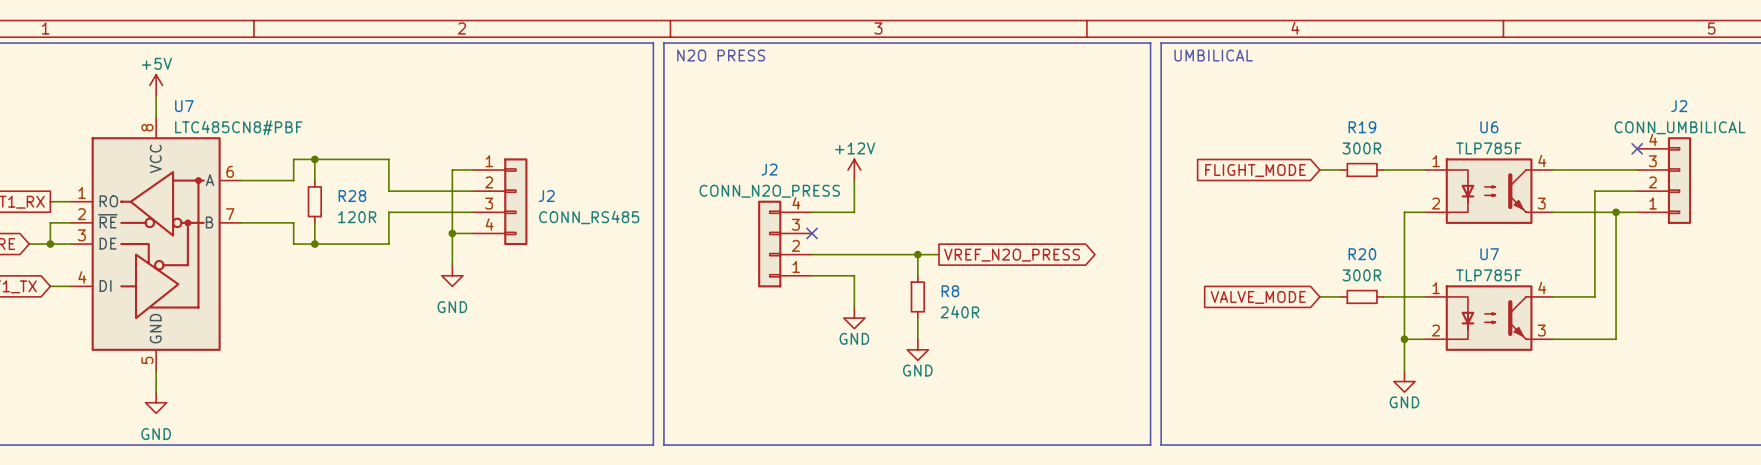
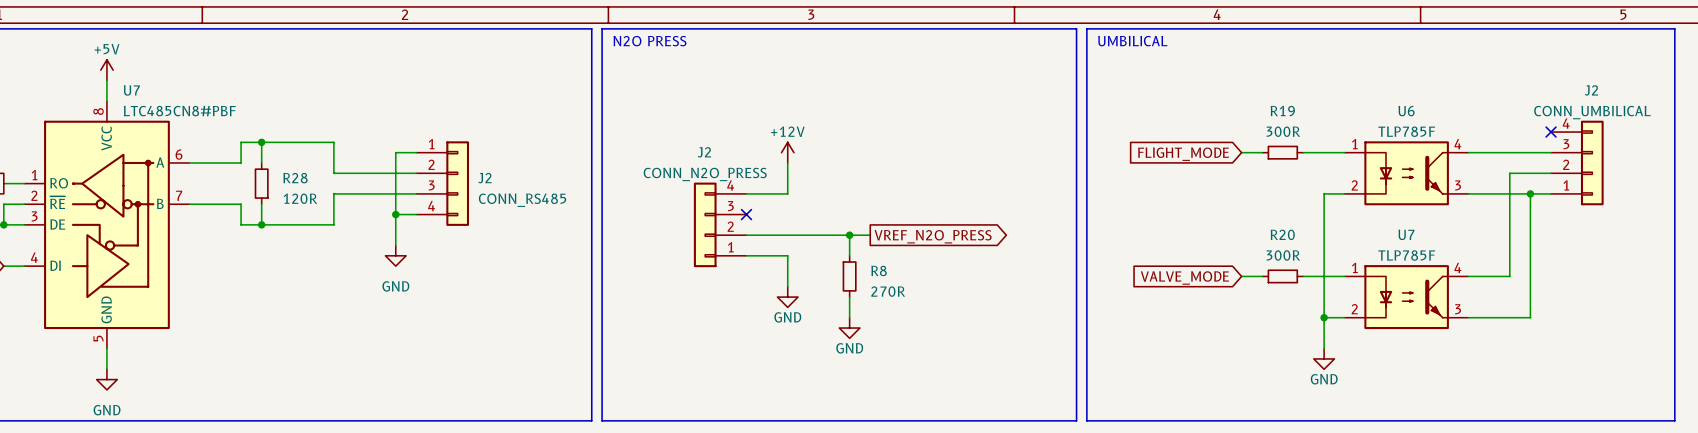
R8 value: 240R (959, 312) -> 270R (888, 291)

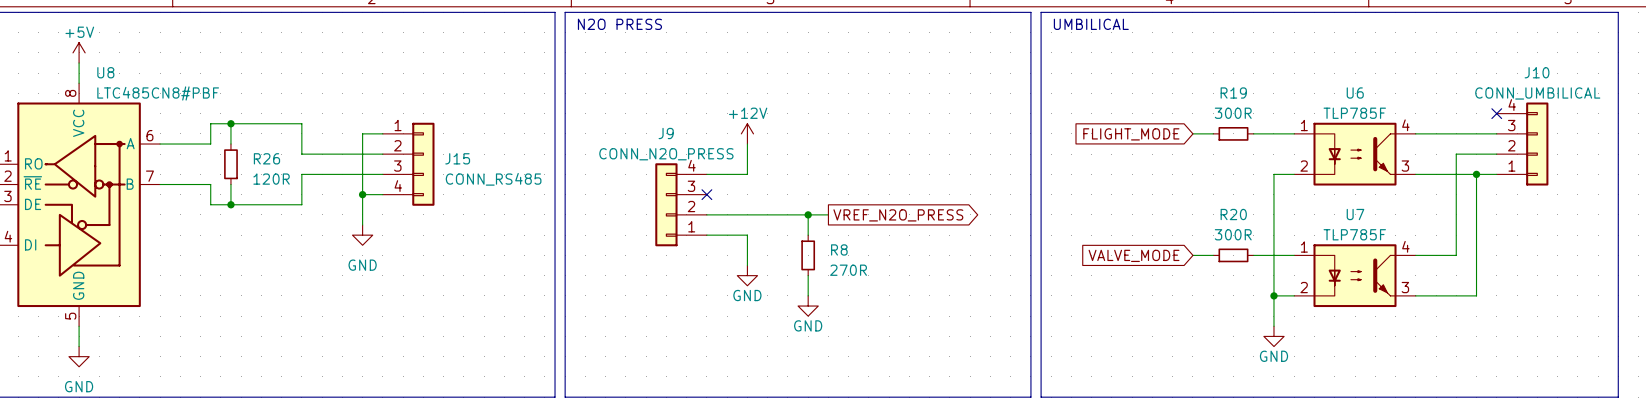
U7 name: U7 (131, 90) -> U8 (105, 72)
J2 name: J2 (1591, 90) -> J10 (1537, 72)
J2 name: J2 (704, 152) -> J9 (666, 133)
R28 name: R28 (295, 178) -> R26 (266, 158)
J2 name: J2 (484, 178) -> J15 (457, 158)

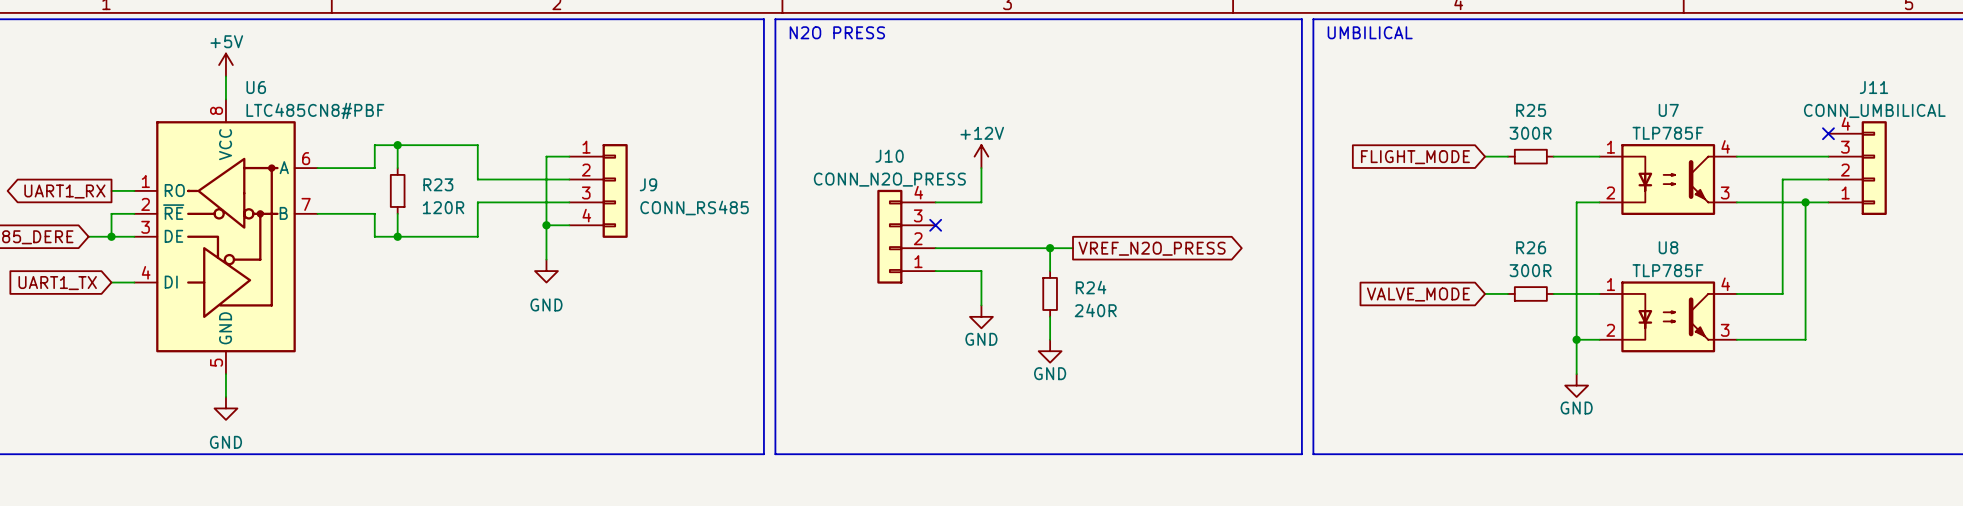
U8 name: U8 (105, 72) -> U6 (256, 87)
J10 name: J10 (1537, 72) -> J11 (1873, 87)
R19 name: R19 (1233, 93) -> R25 (1531, 110)
U6 name: U6 (1355, 93) -> U7 (1668, 110)
J9 name: J9 (666, 133) -> J10 (889, 156)
R26 name: R26 (266, 158) -> R23 (438, 184)
J15 name: J15 (457, 158) -> J9 (648, 184)
R20 name: R20 (1233, 214) -> R26 (1531, 247)
U7 name: U7 (1355, 214) -> U8 (1668, 247)
R8 name: R8 (839, 249) -> R24 (1091, 287)
R8 value: 270R (848, 270) -> 240R (1095, 310)

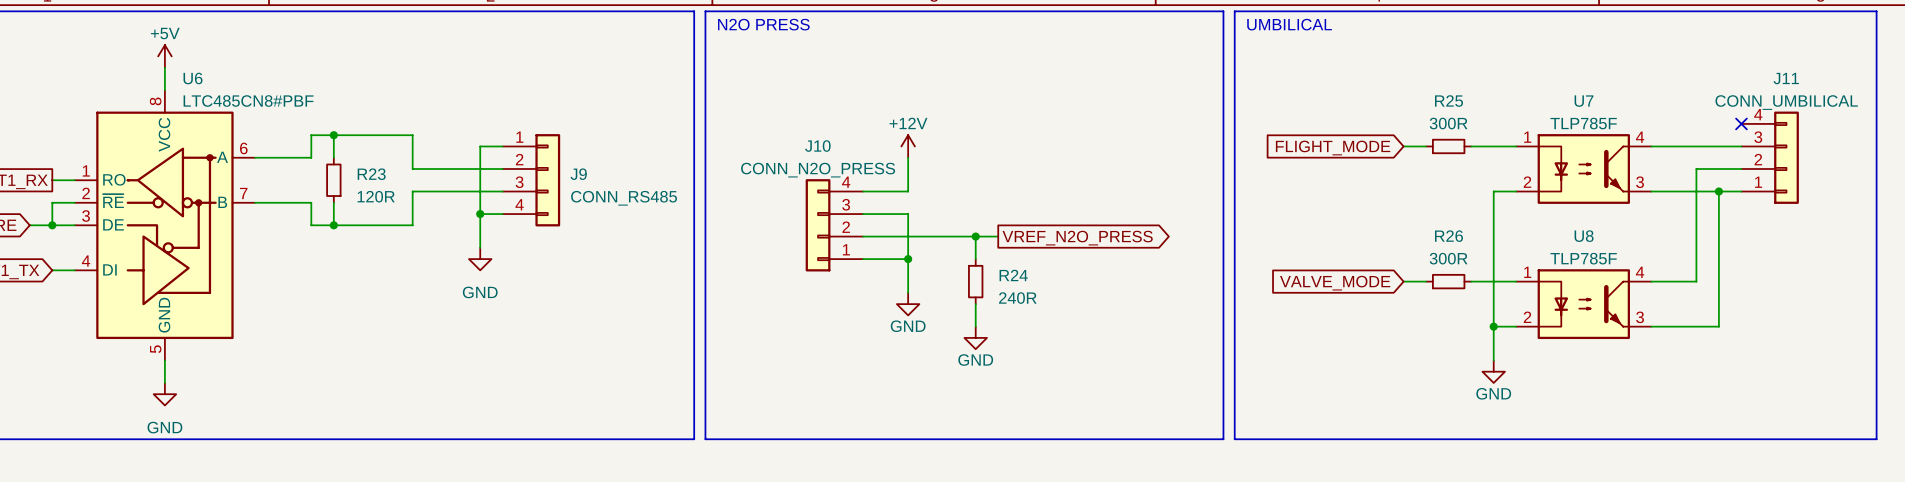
wire: none -> (863, 214) (908, 214) (908, 259)
no-connect mark: (935, 225) -> none
junction: none -> (908, 259)

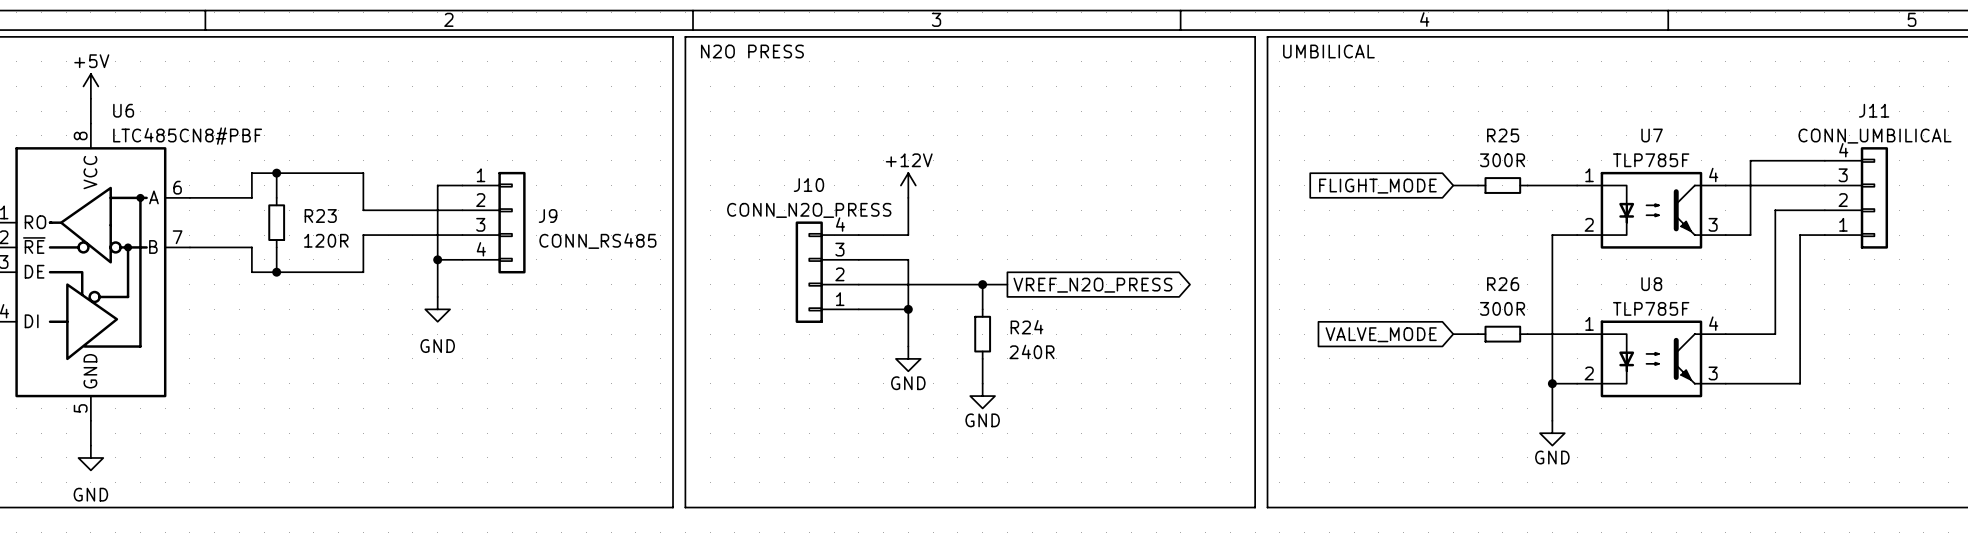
no-connect mark: (1741, 123) -> none
wire: (1673, 191) (1718, 191) -> (1750, 235) (1750, 160) (1824, 160)
junction: (1718, 191) -> none

